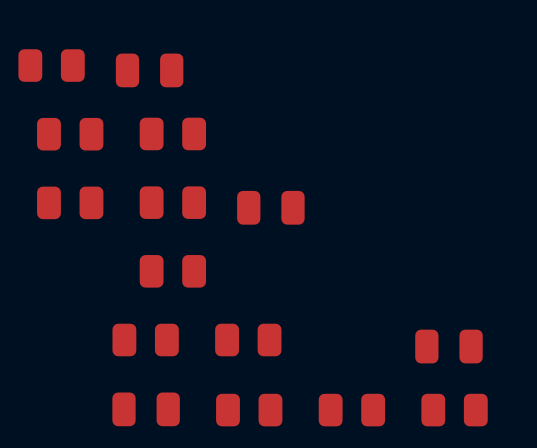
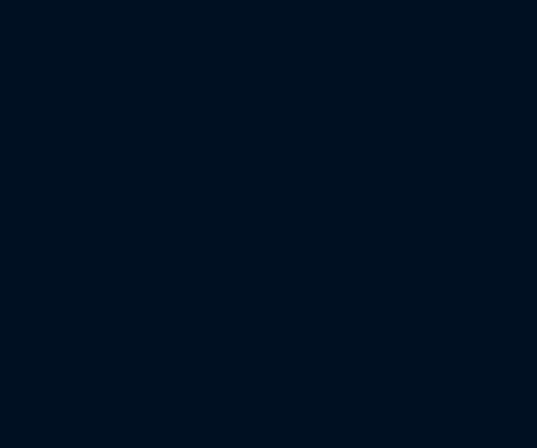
part: (51, 65) -> none
part: (149, 70) -> none
part: (172, 133) -> none
part: (70, 134) -> none
part: (70, 202) -> none
part: (172, 202) -> none
part: (270, 207) -> none
part: (172, 271) -> none
part: (145, 340) -> none
part: (248, 340) -> none
part: (448, 346) -> none
part: (146, 409) -> none
part: (249, 410) -> none
part: (351, 410) -> none
part: (454, 410) -> none

